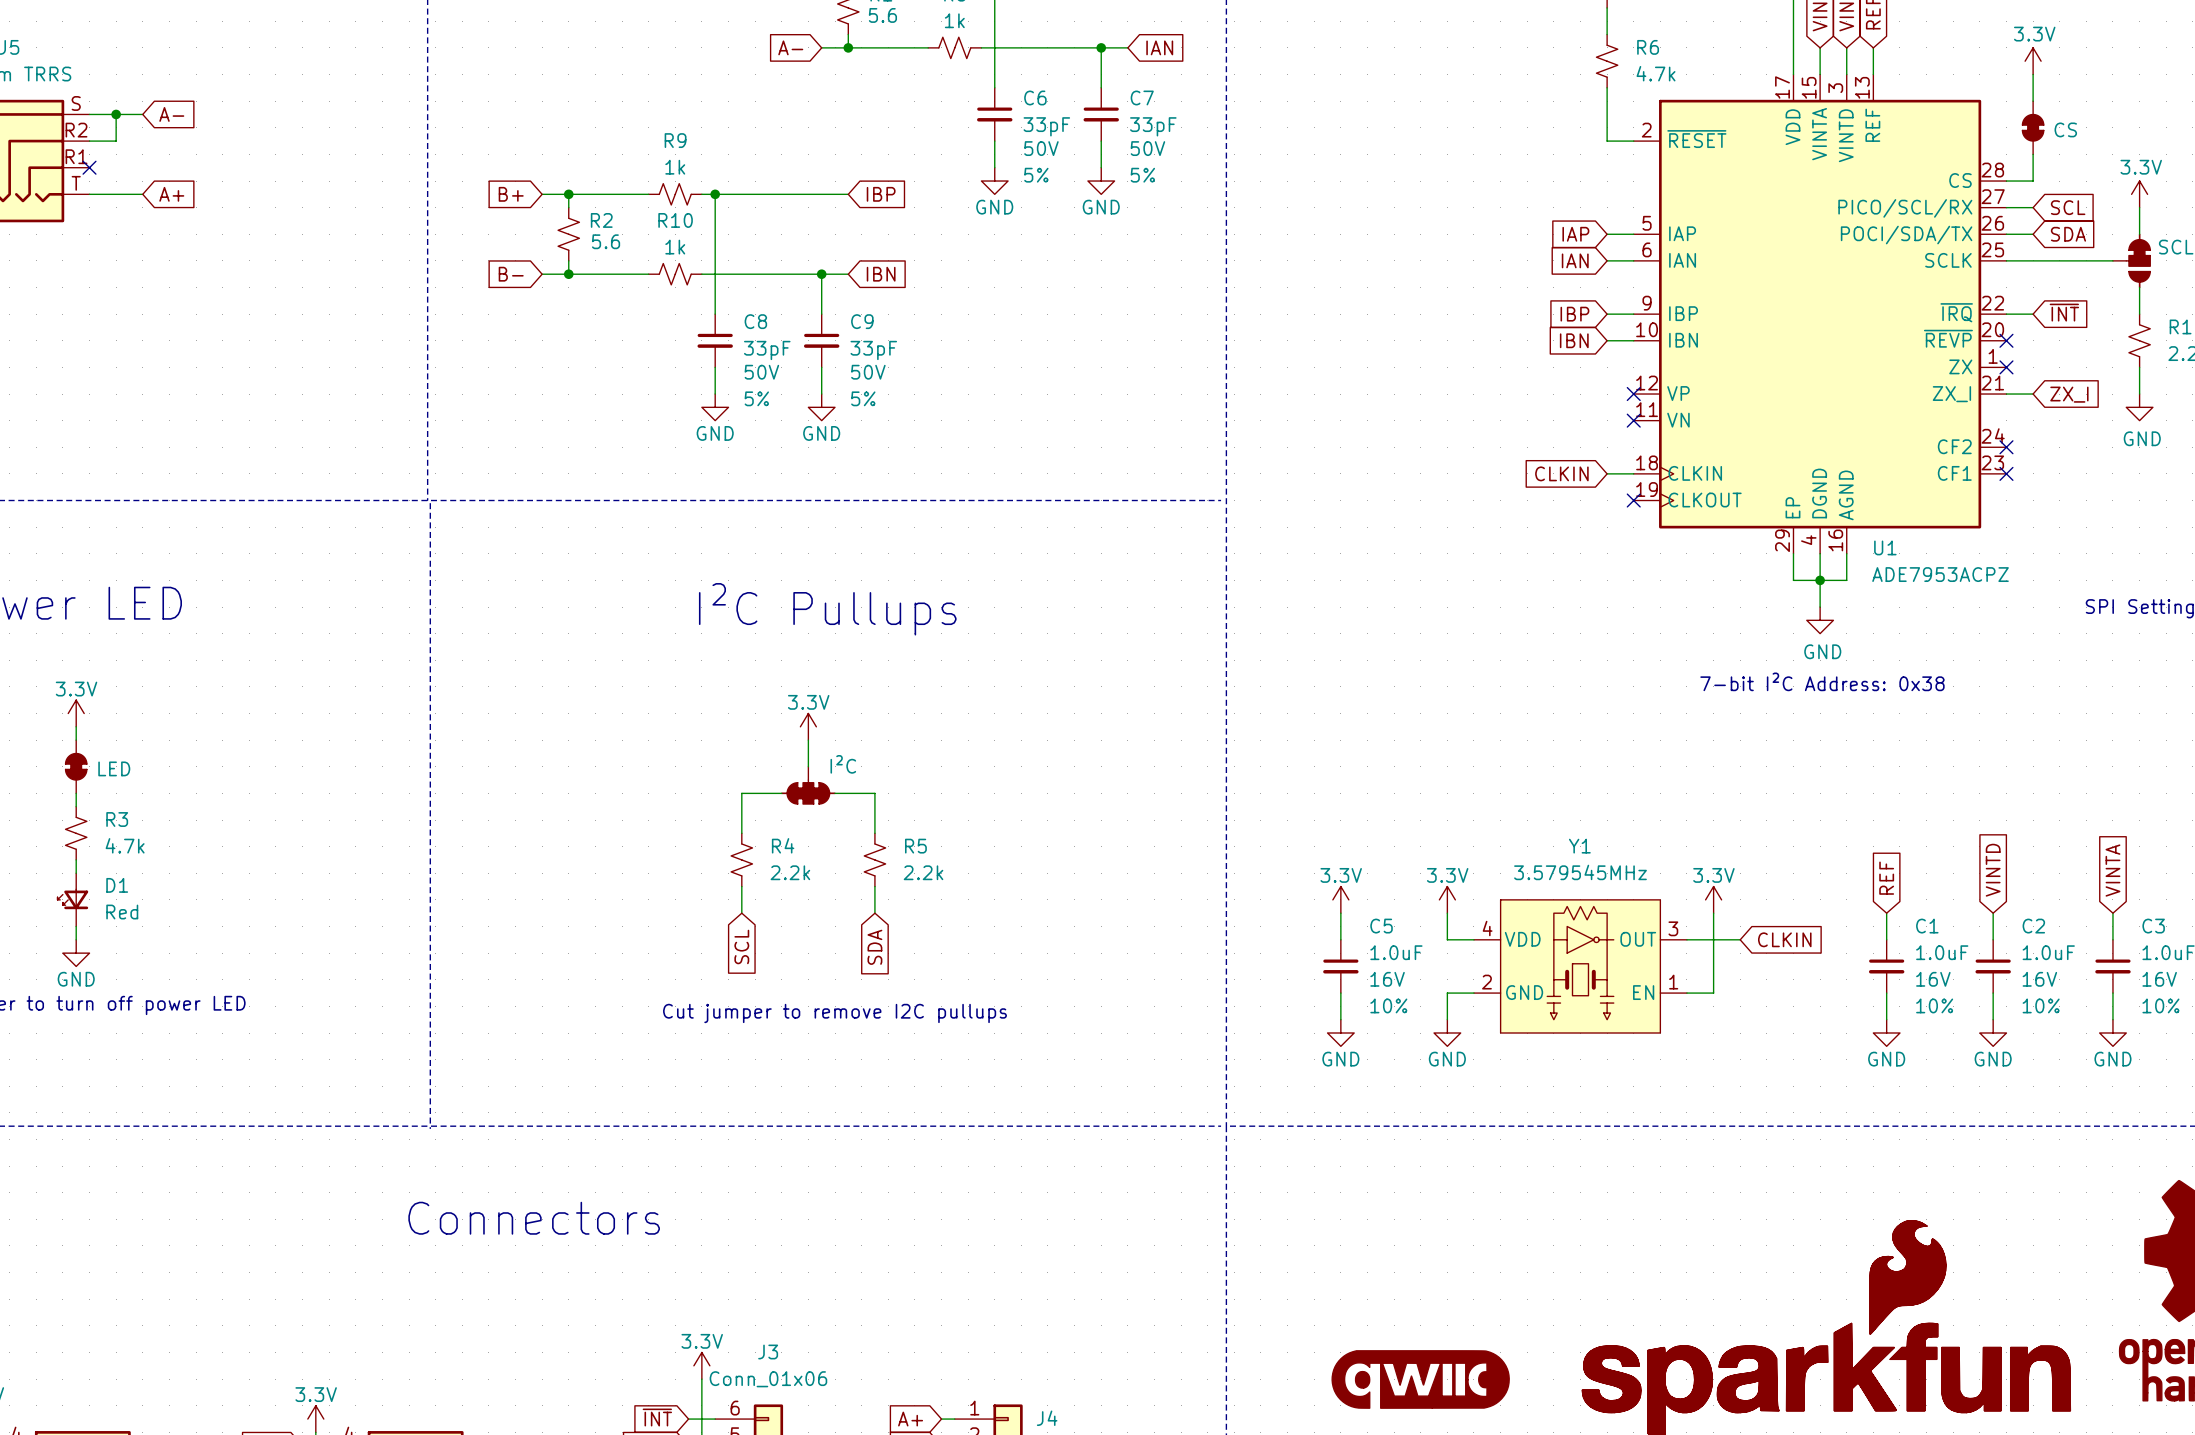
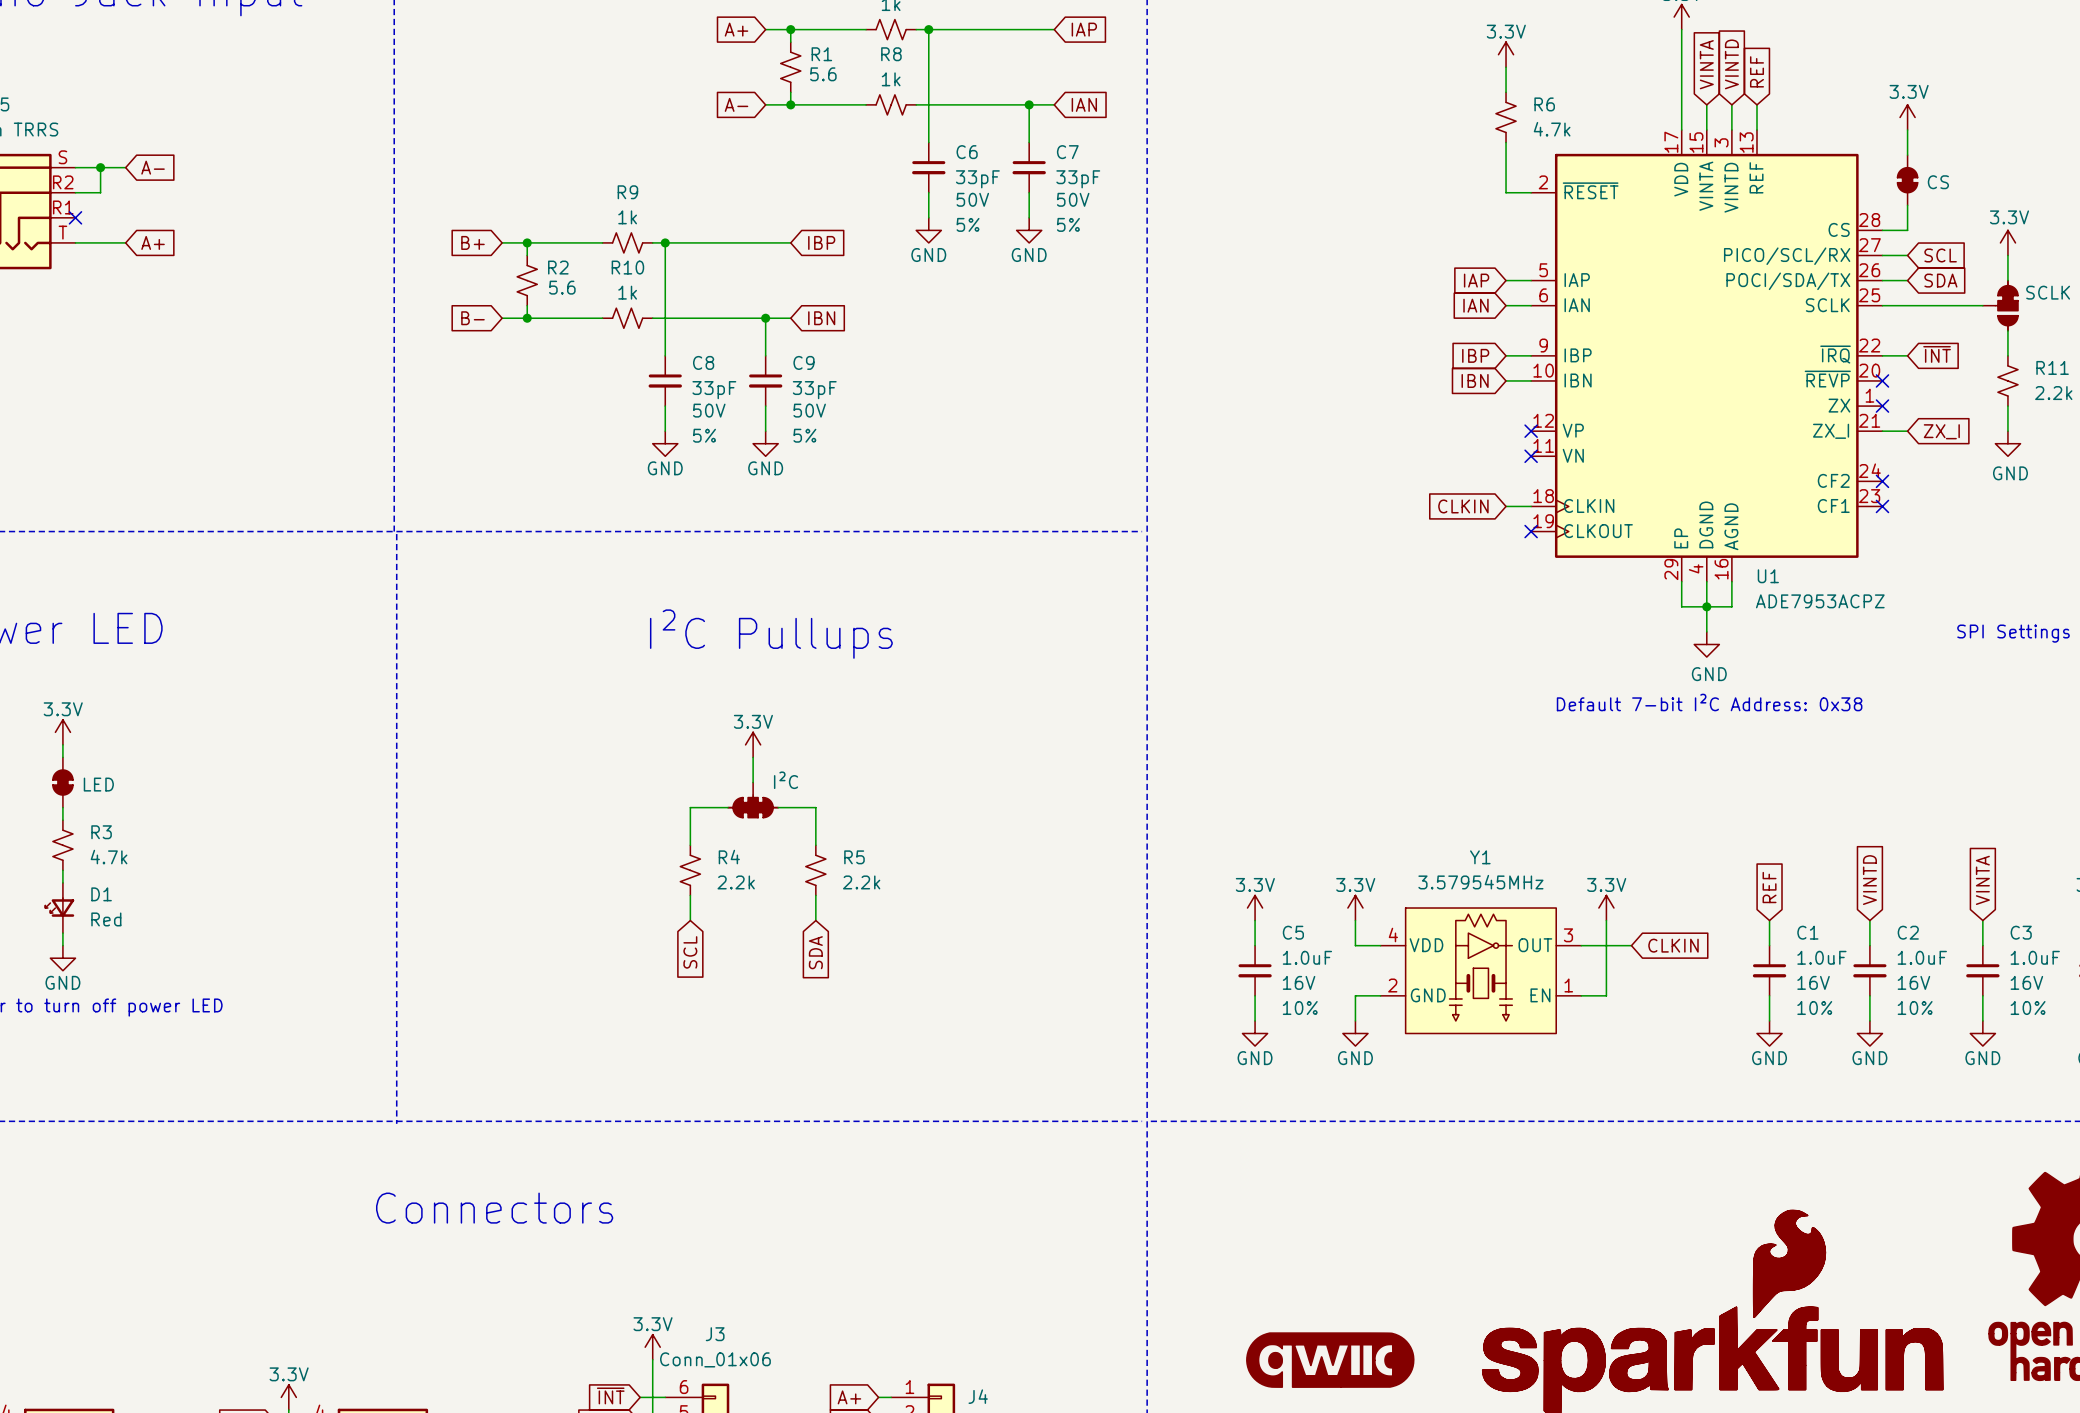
text: 7-bit I²C Address: 0x38 (1822, 681) -> Default 7-bit I²C Address: 0x38 (1709, 702)
text: Cut jumper to remove I2C pullups (835, 1013) -> none

